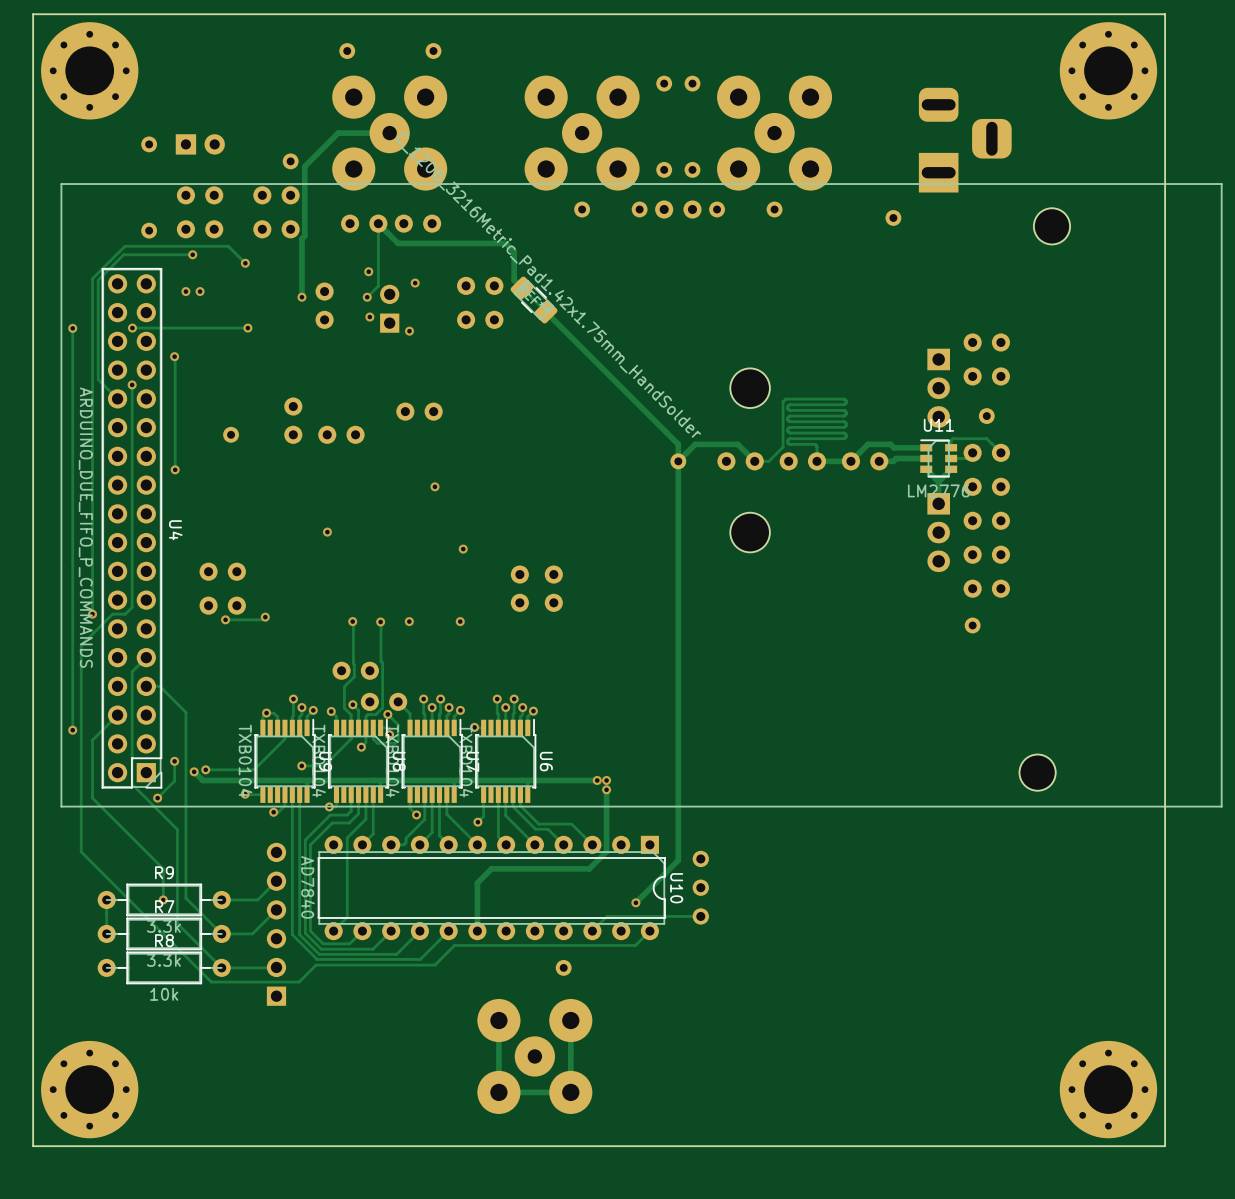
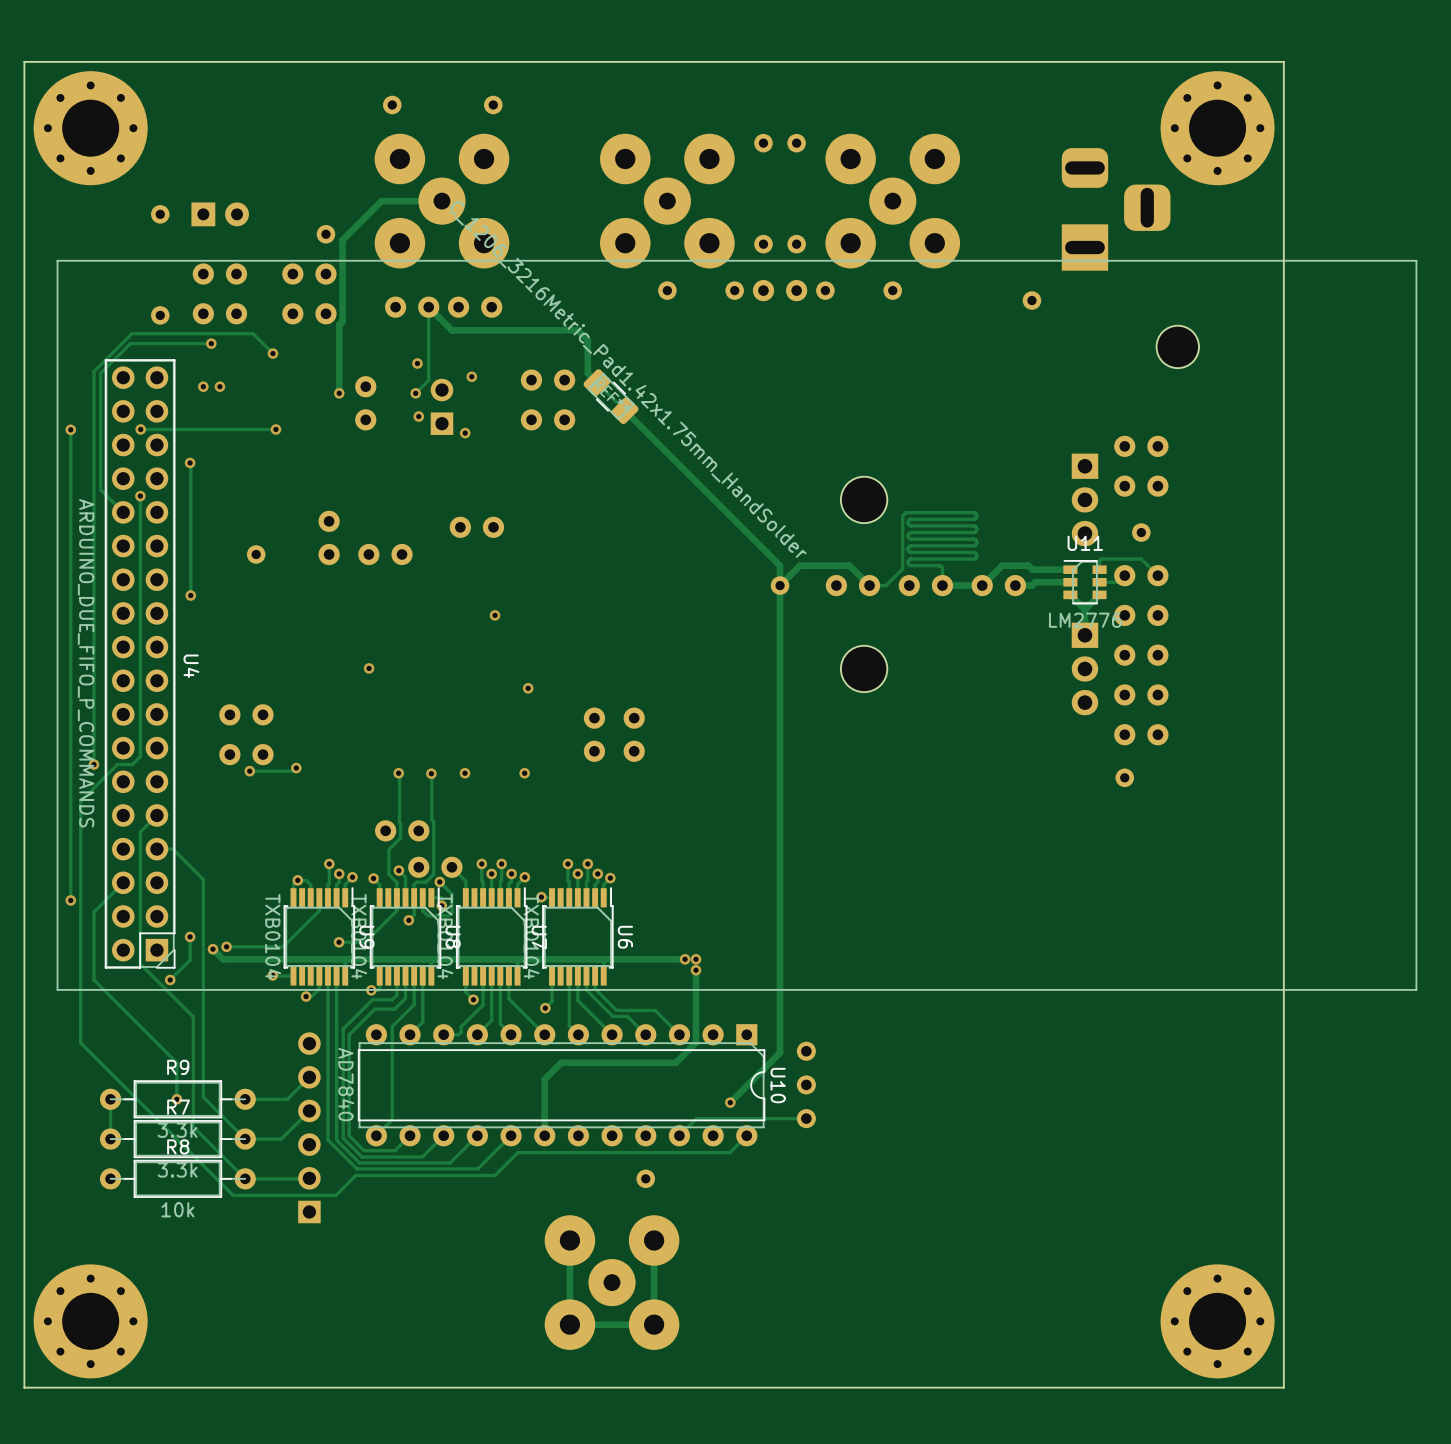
board edge: (1108, 14) (1165, 14) (1165, 1146) (1108, 1146) -> (1283, 61) (1283, 1387)
part position: (1108, 70) -> (1217, 128)
part position: (1051, 226) -> (1177, 346)
part: (1037, 772) -> none
part position: (1108, 1089) -> (1217, 1321)

